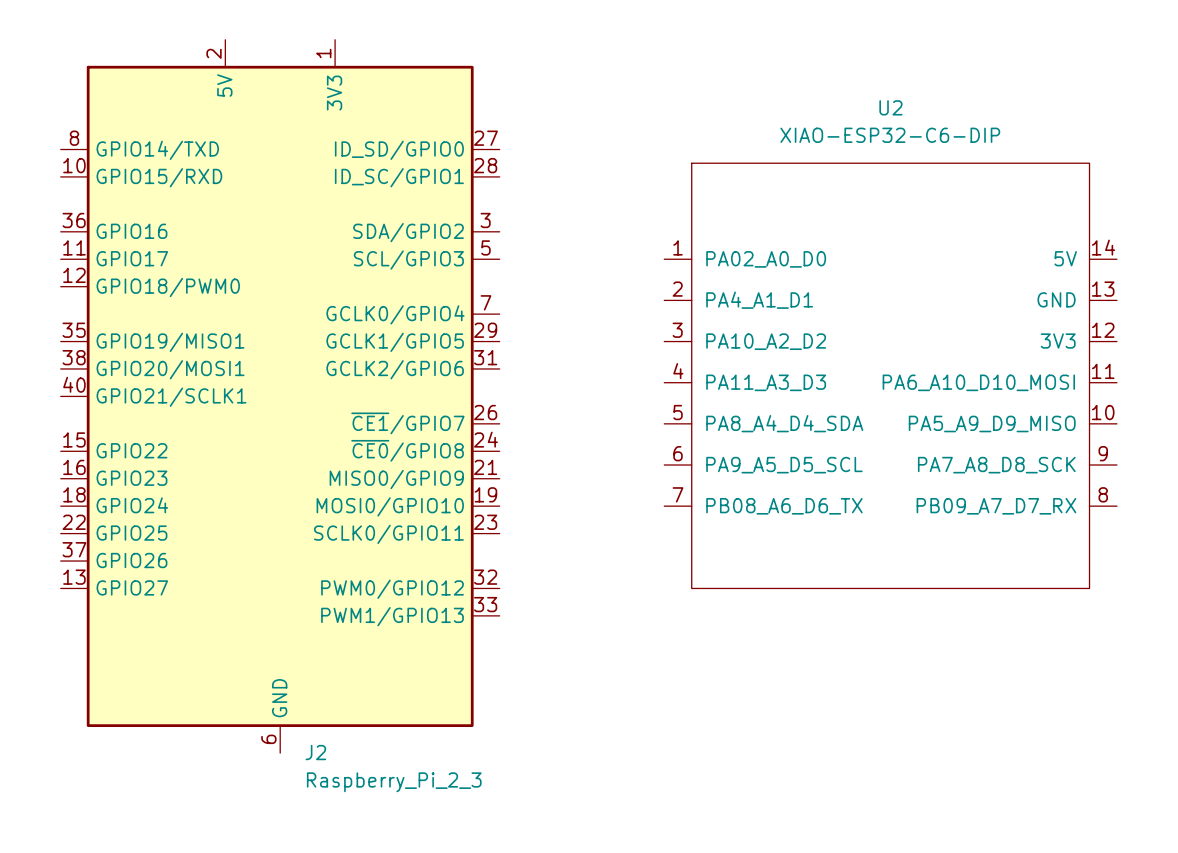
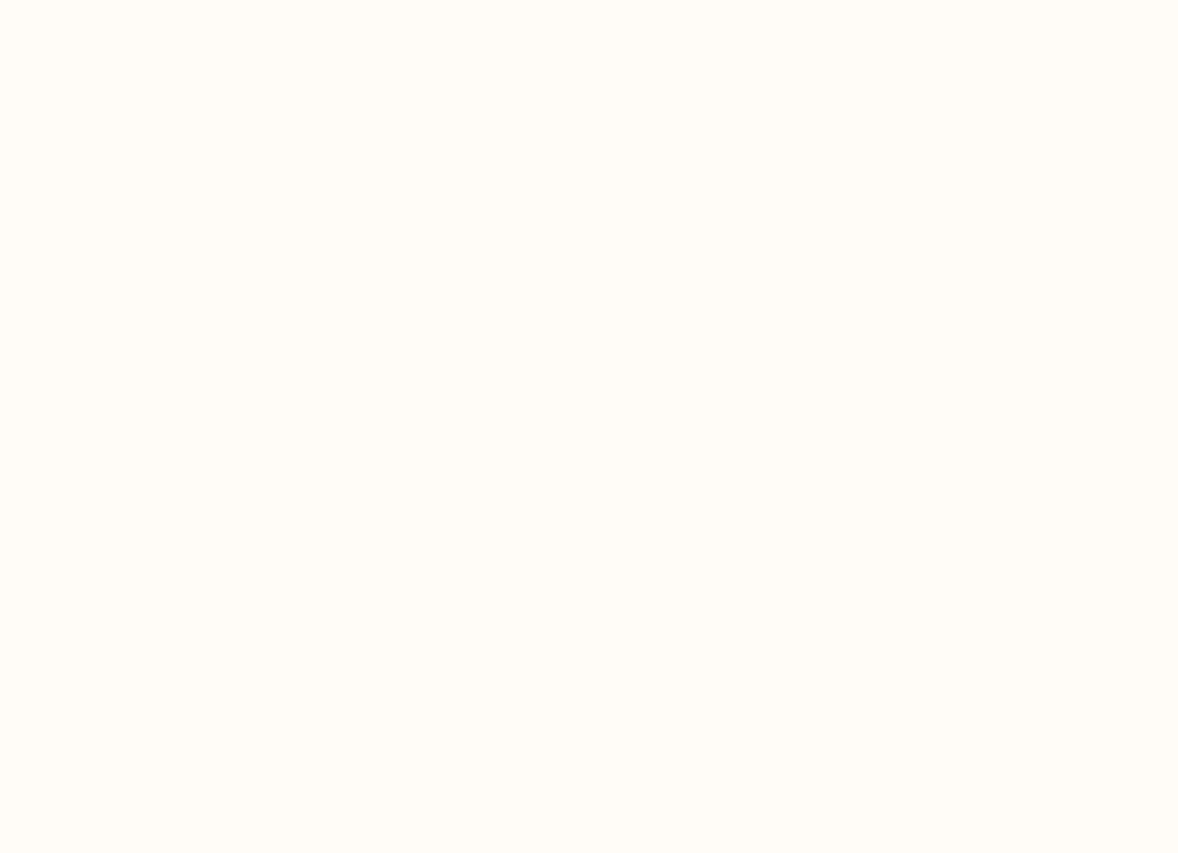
U2: XIAO-ESP32-C6-DIP (890, 375) -> none
J2: Raspberry_Pi_2_3 (280, 396) -> none

